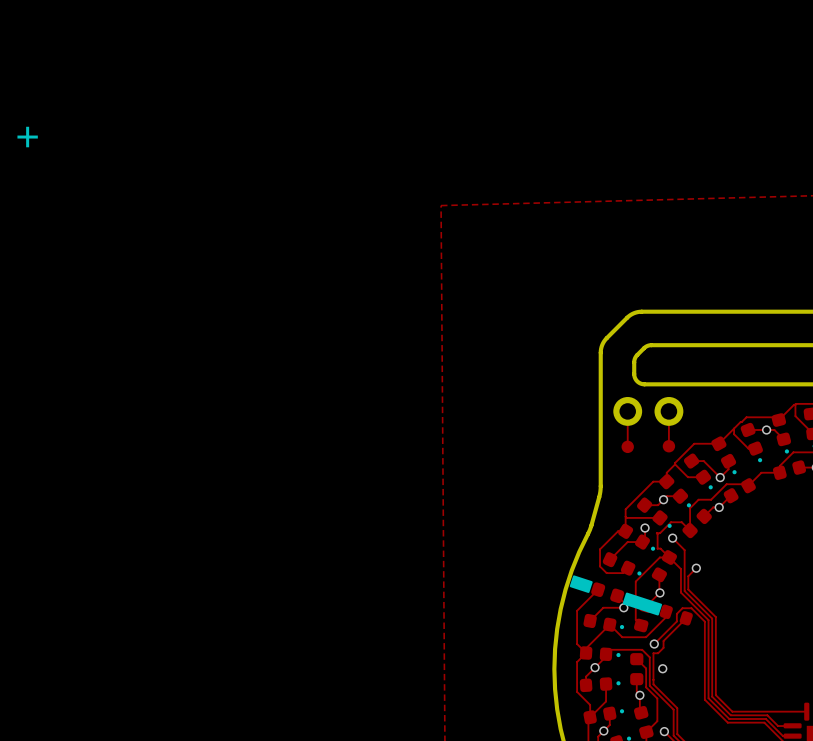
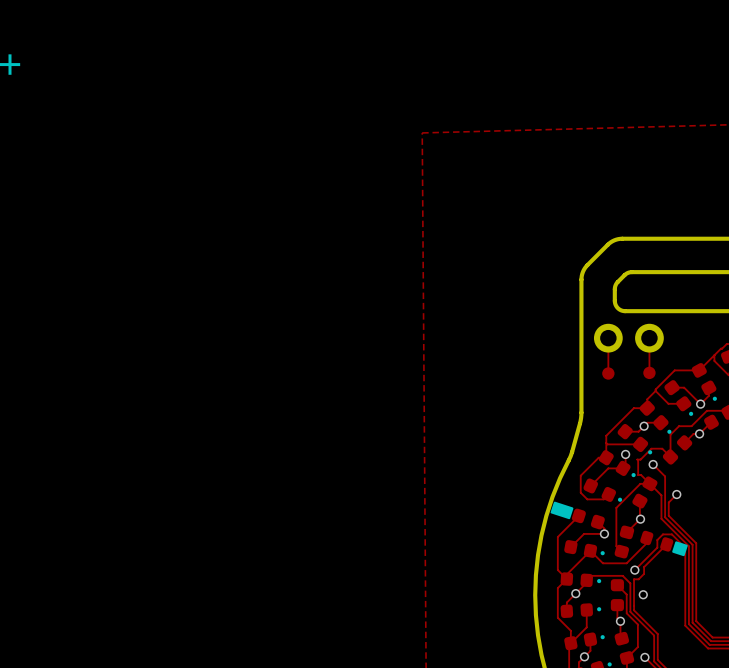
part footprint: [569, 575, 663, 616] -> [550, 501, 605, 530]
part footprint: [659, 604, 693, 626] -> [640, 530, 688, 557]

